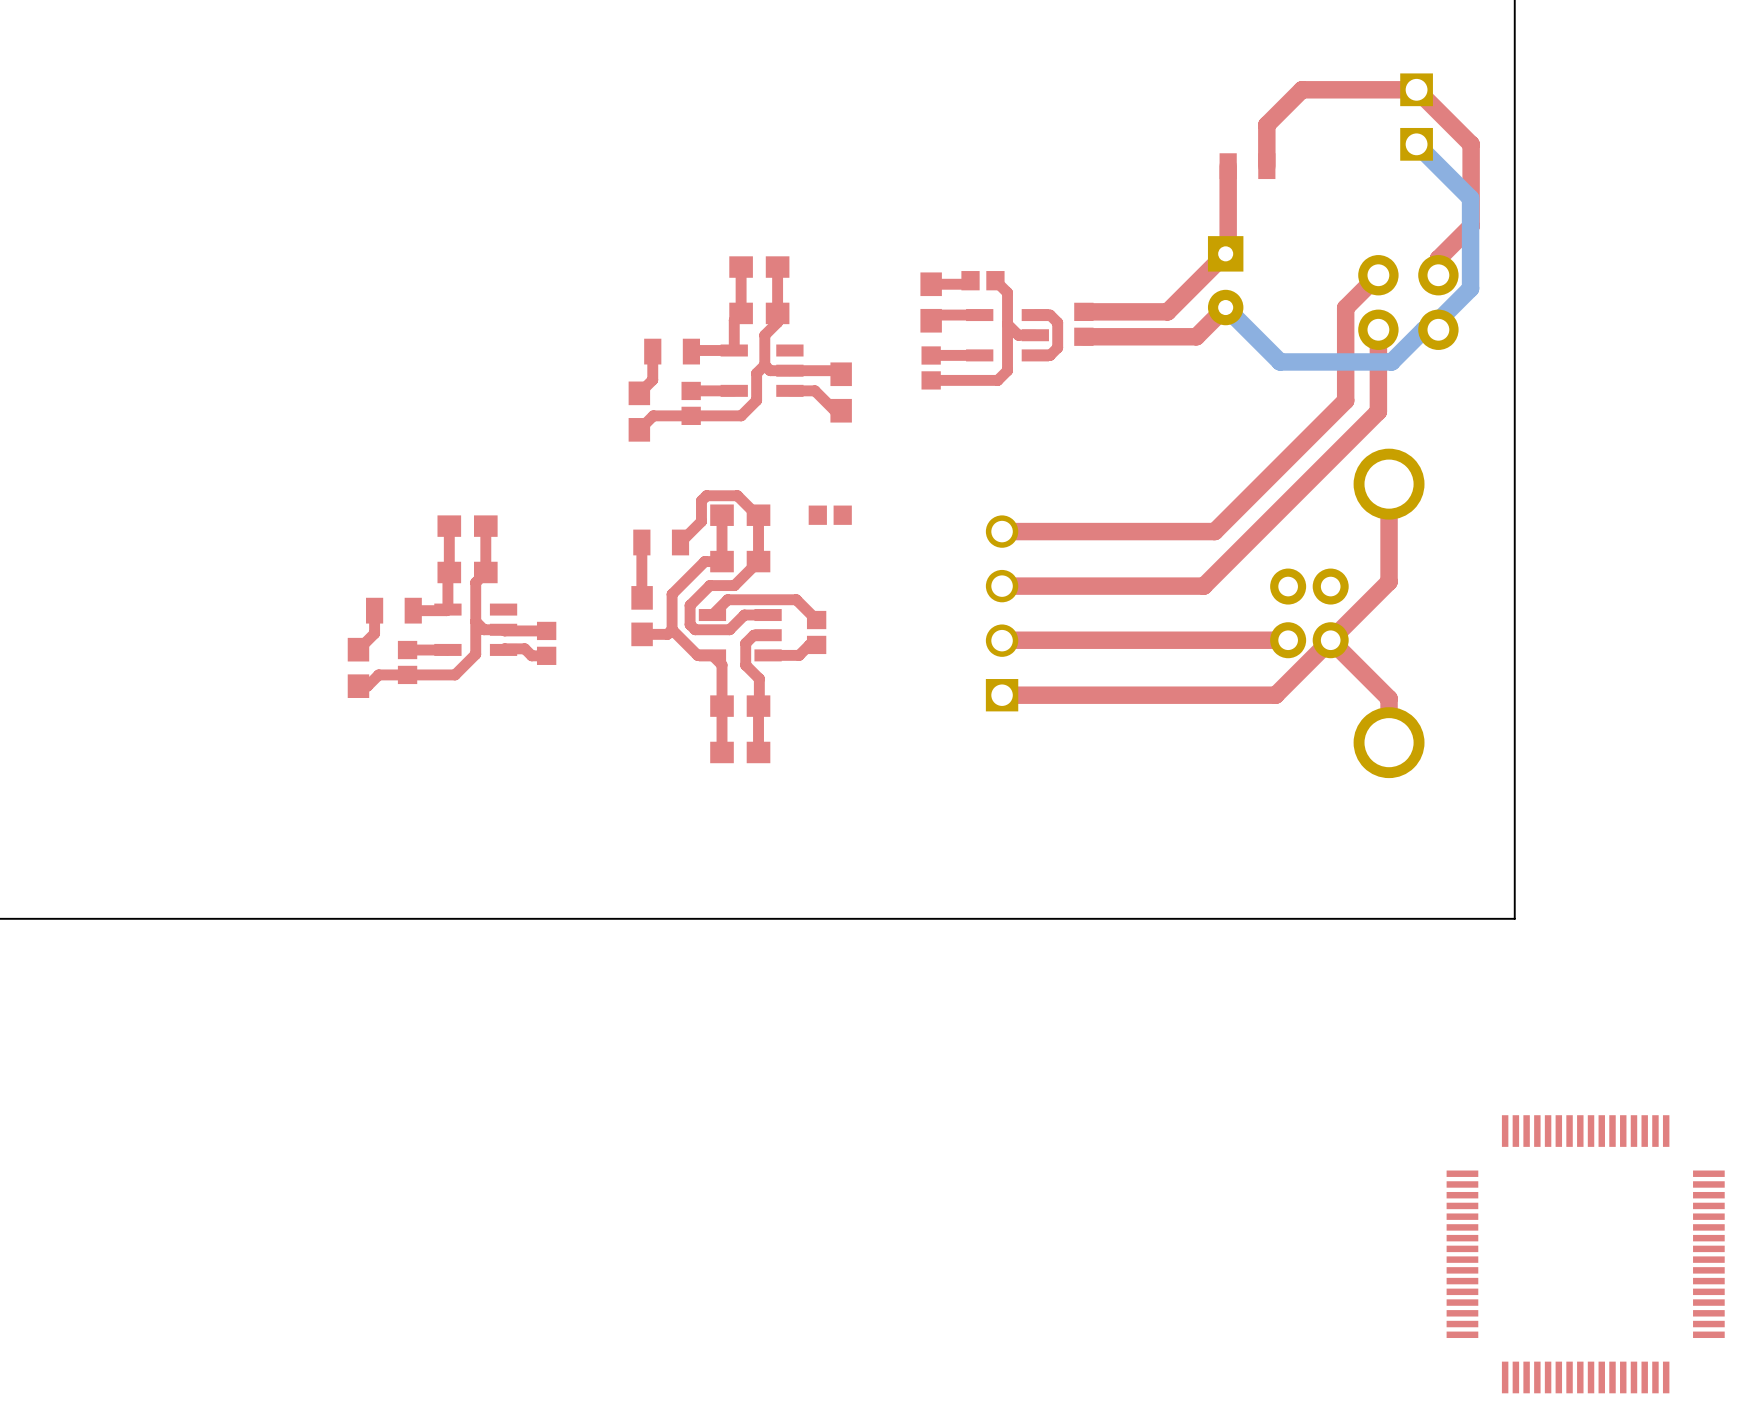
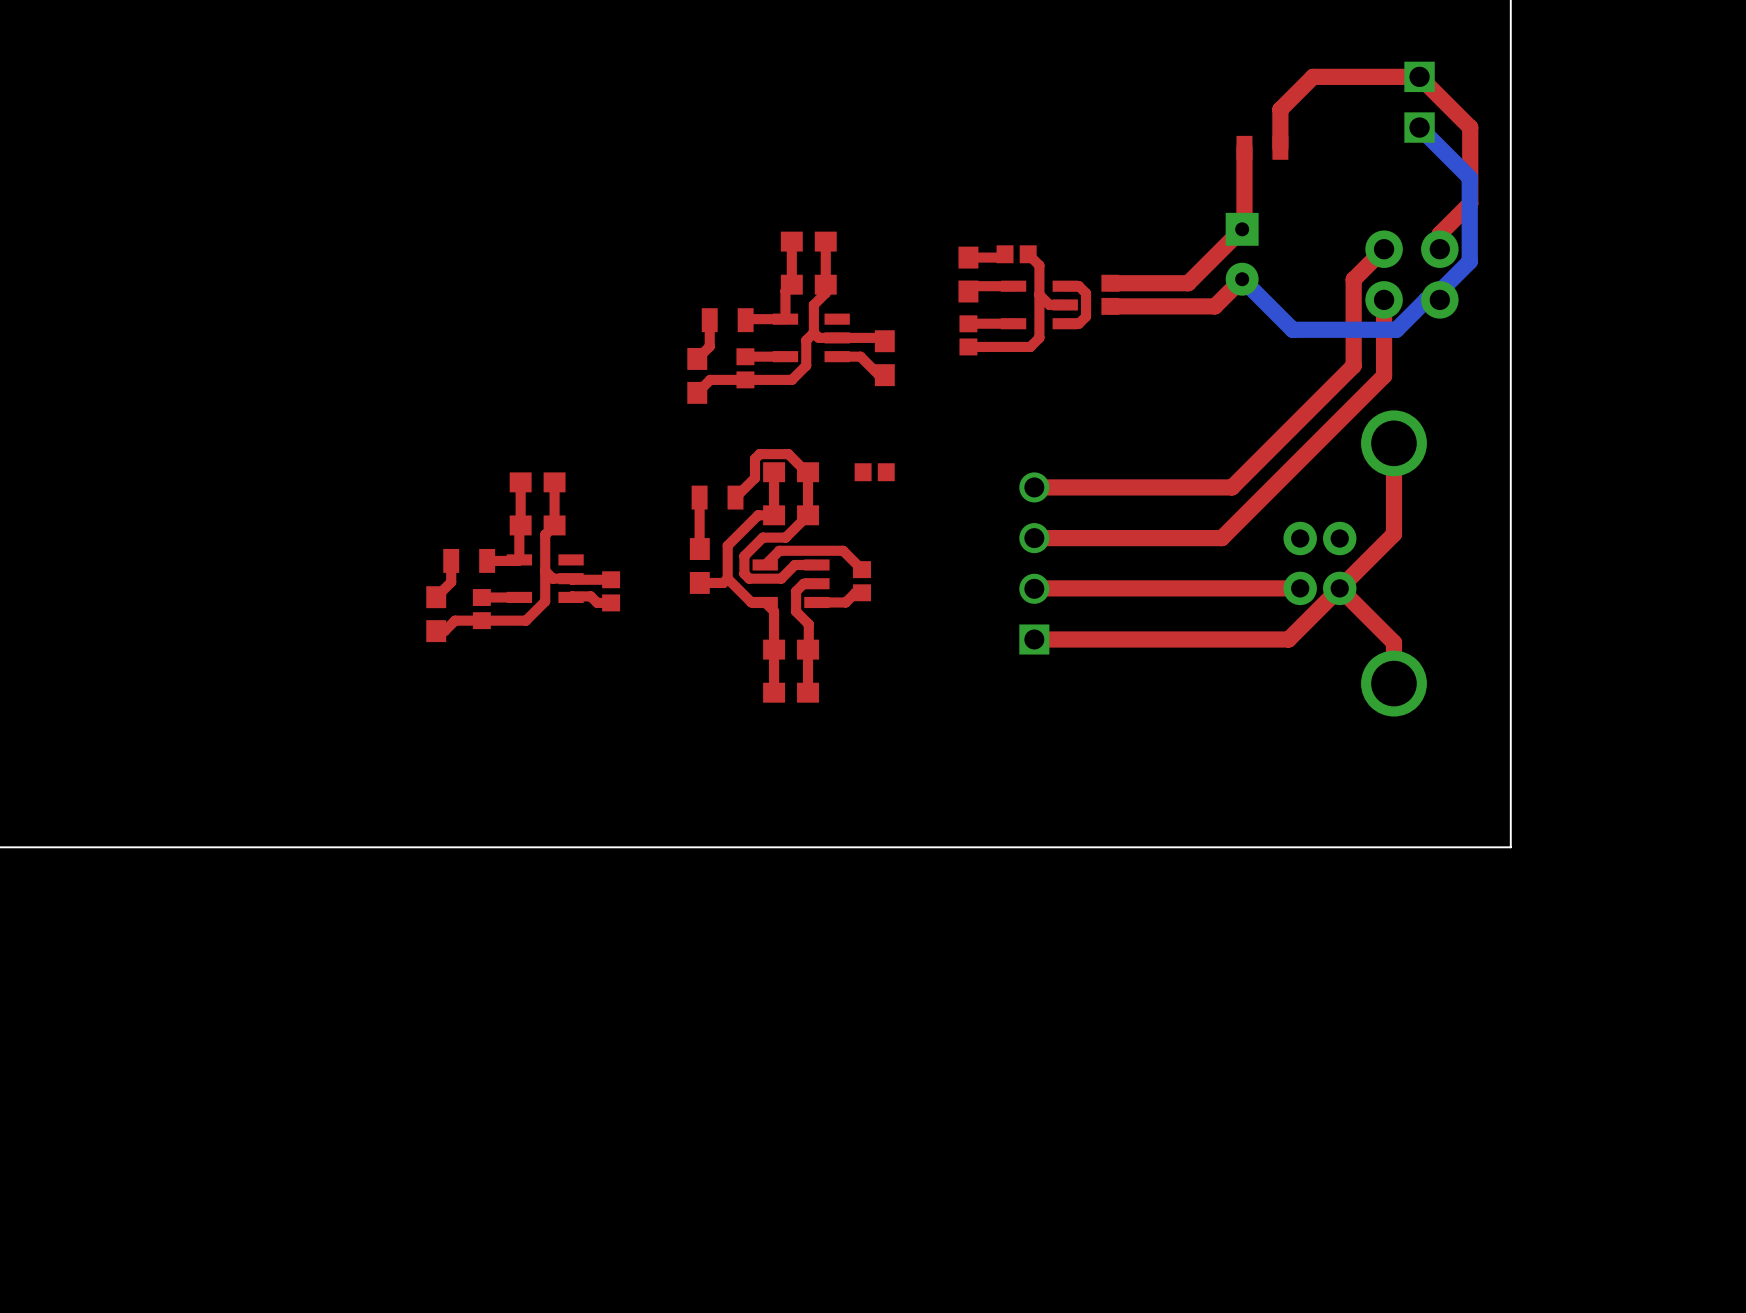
part: (1585, 1254) -> none

